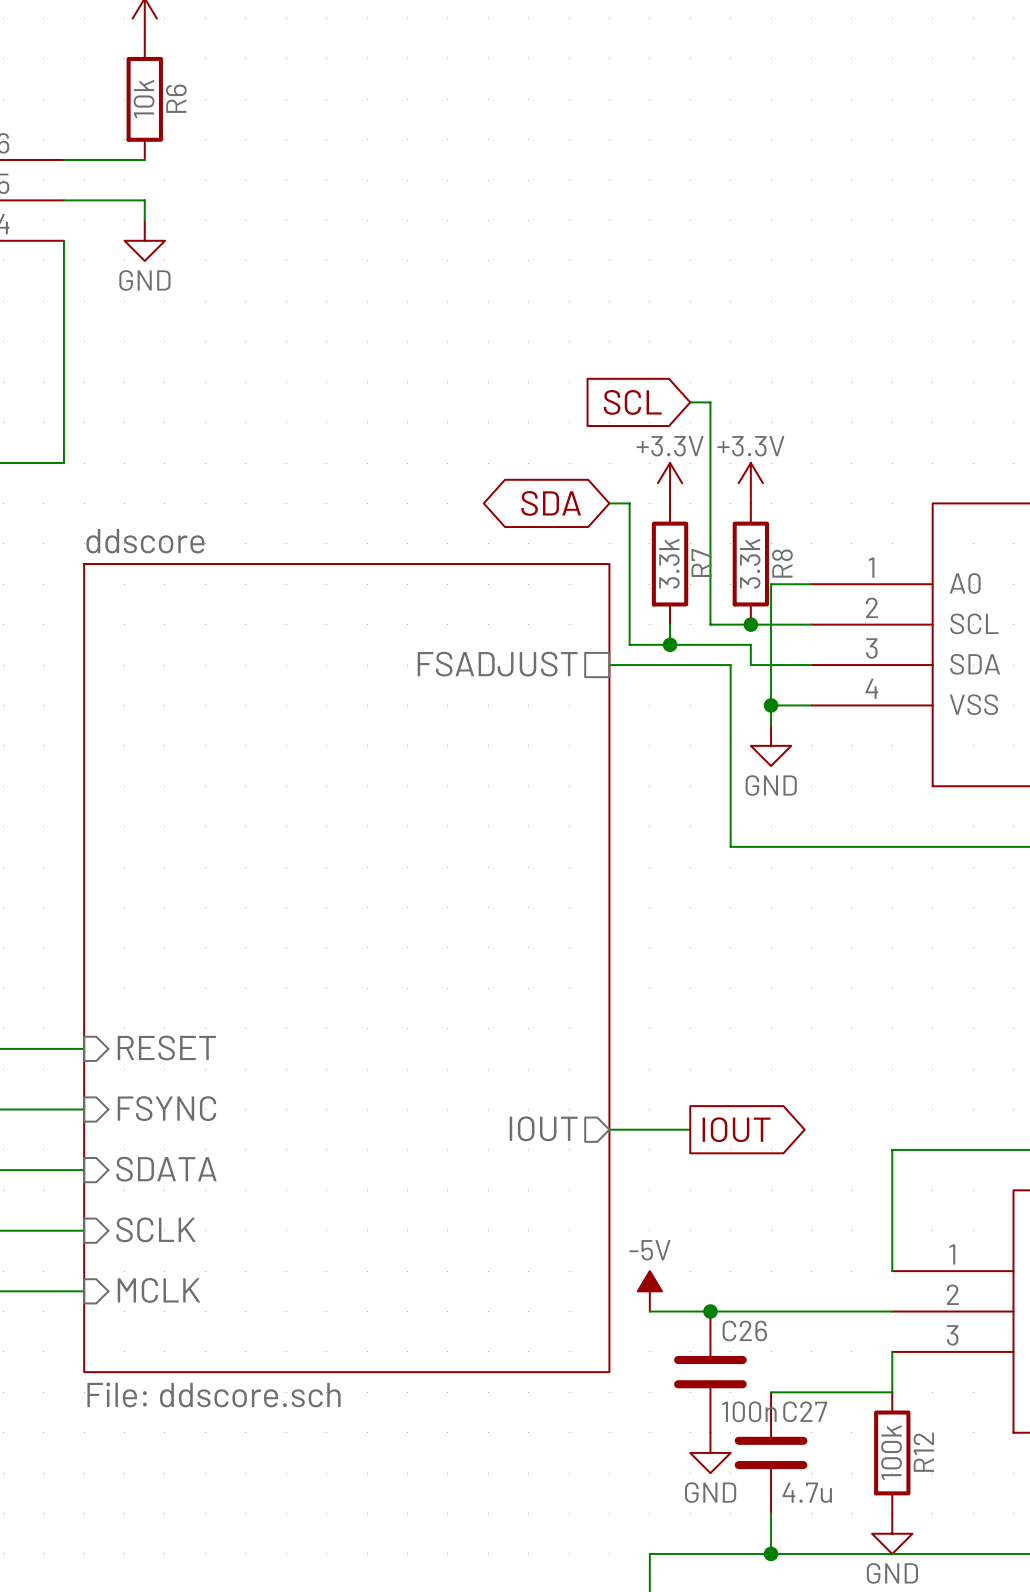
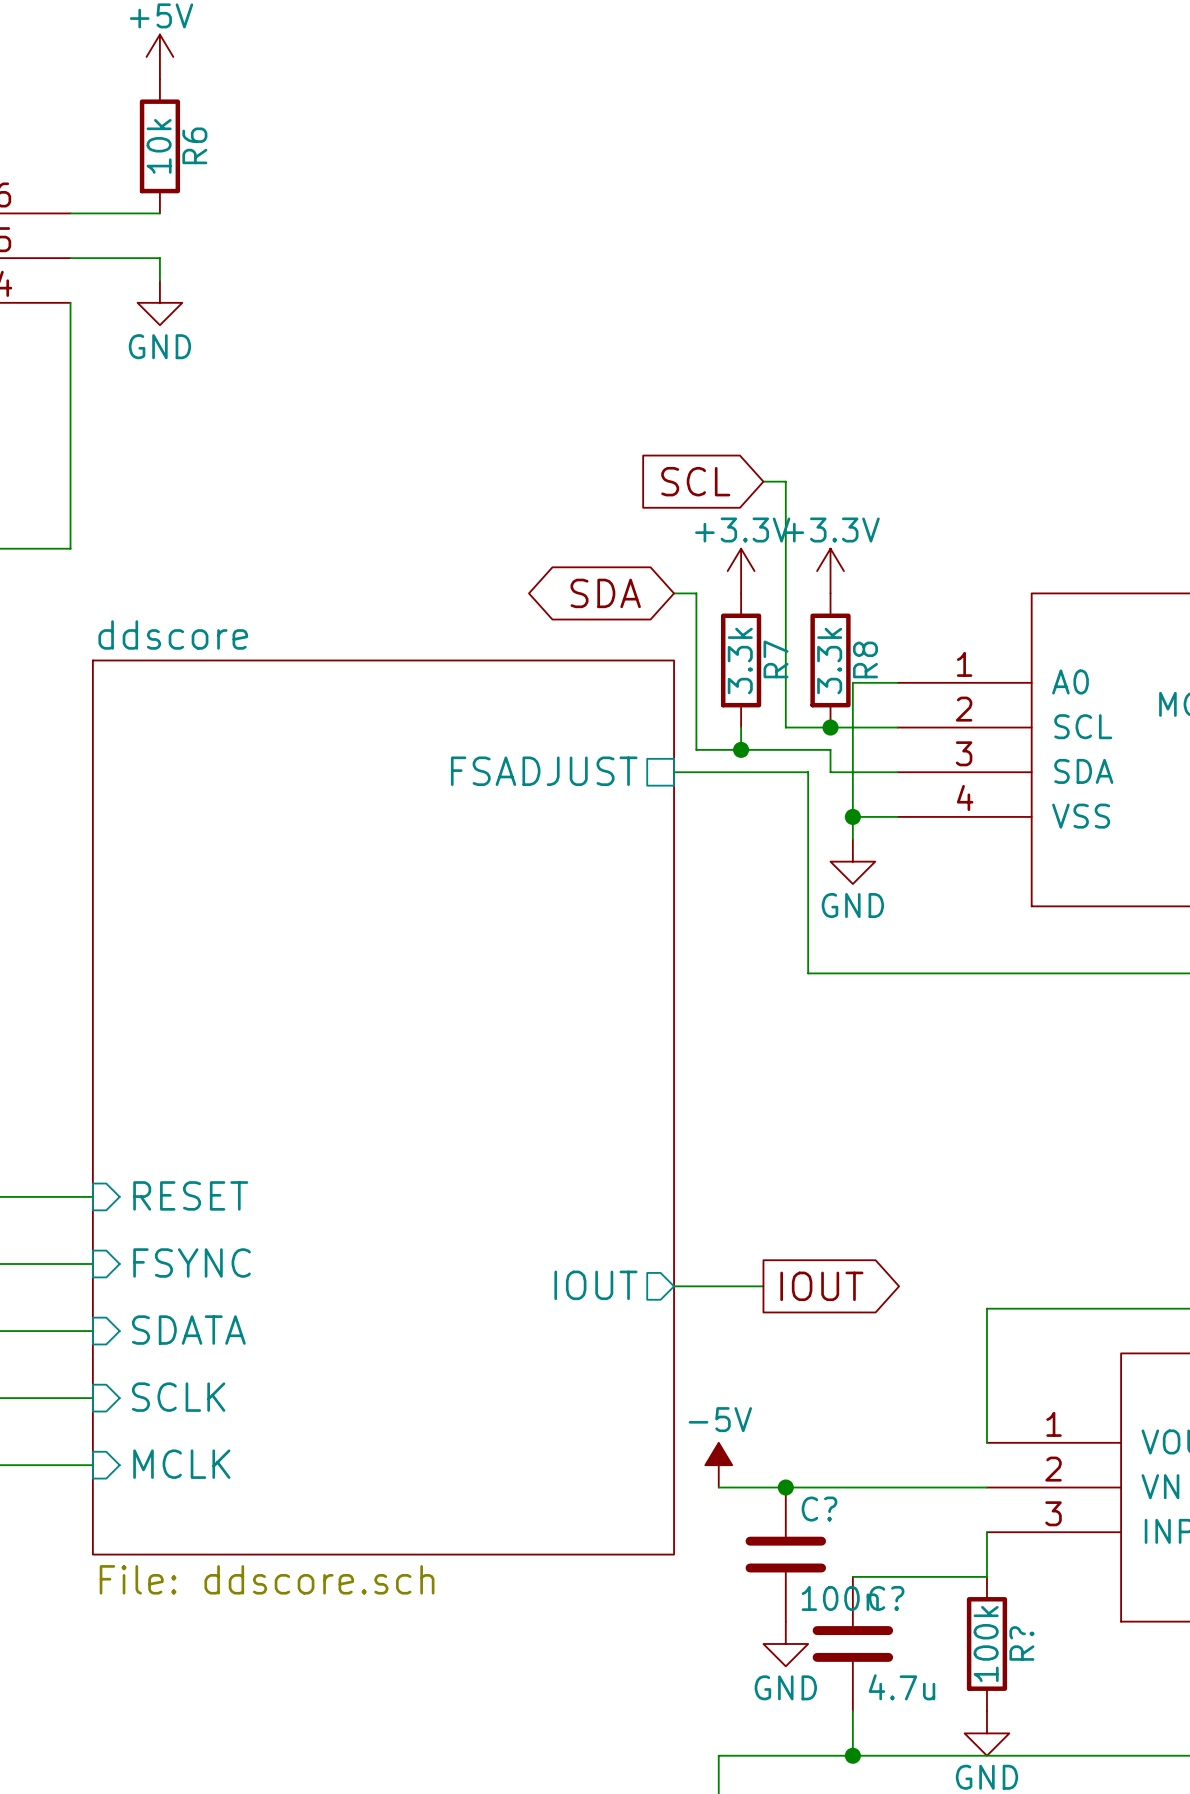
C26 name: C26 (744, 1330) -> C? (819, 1509)
C27 name: C27 (805, 1411) -> C? (886, 1598)
R12 name: R12 (923, 1452) -> R? (1021, 1643)

